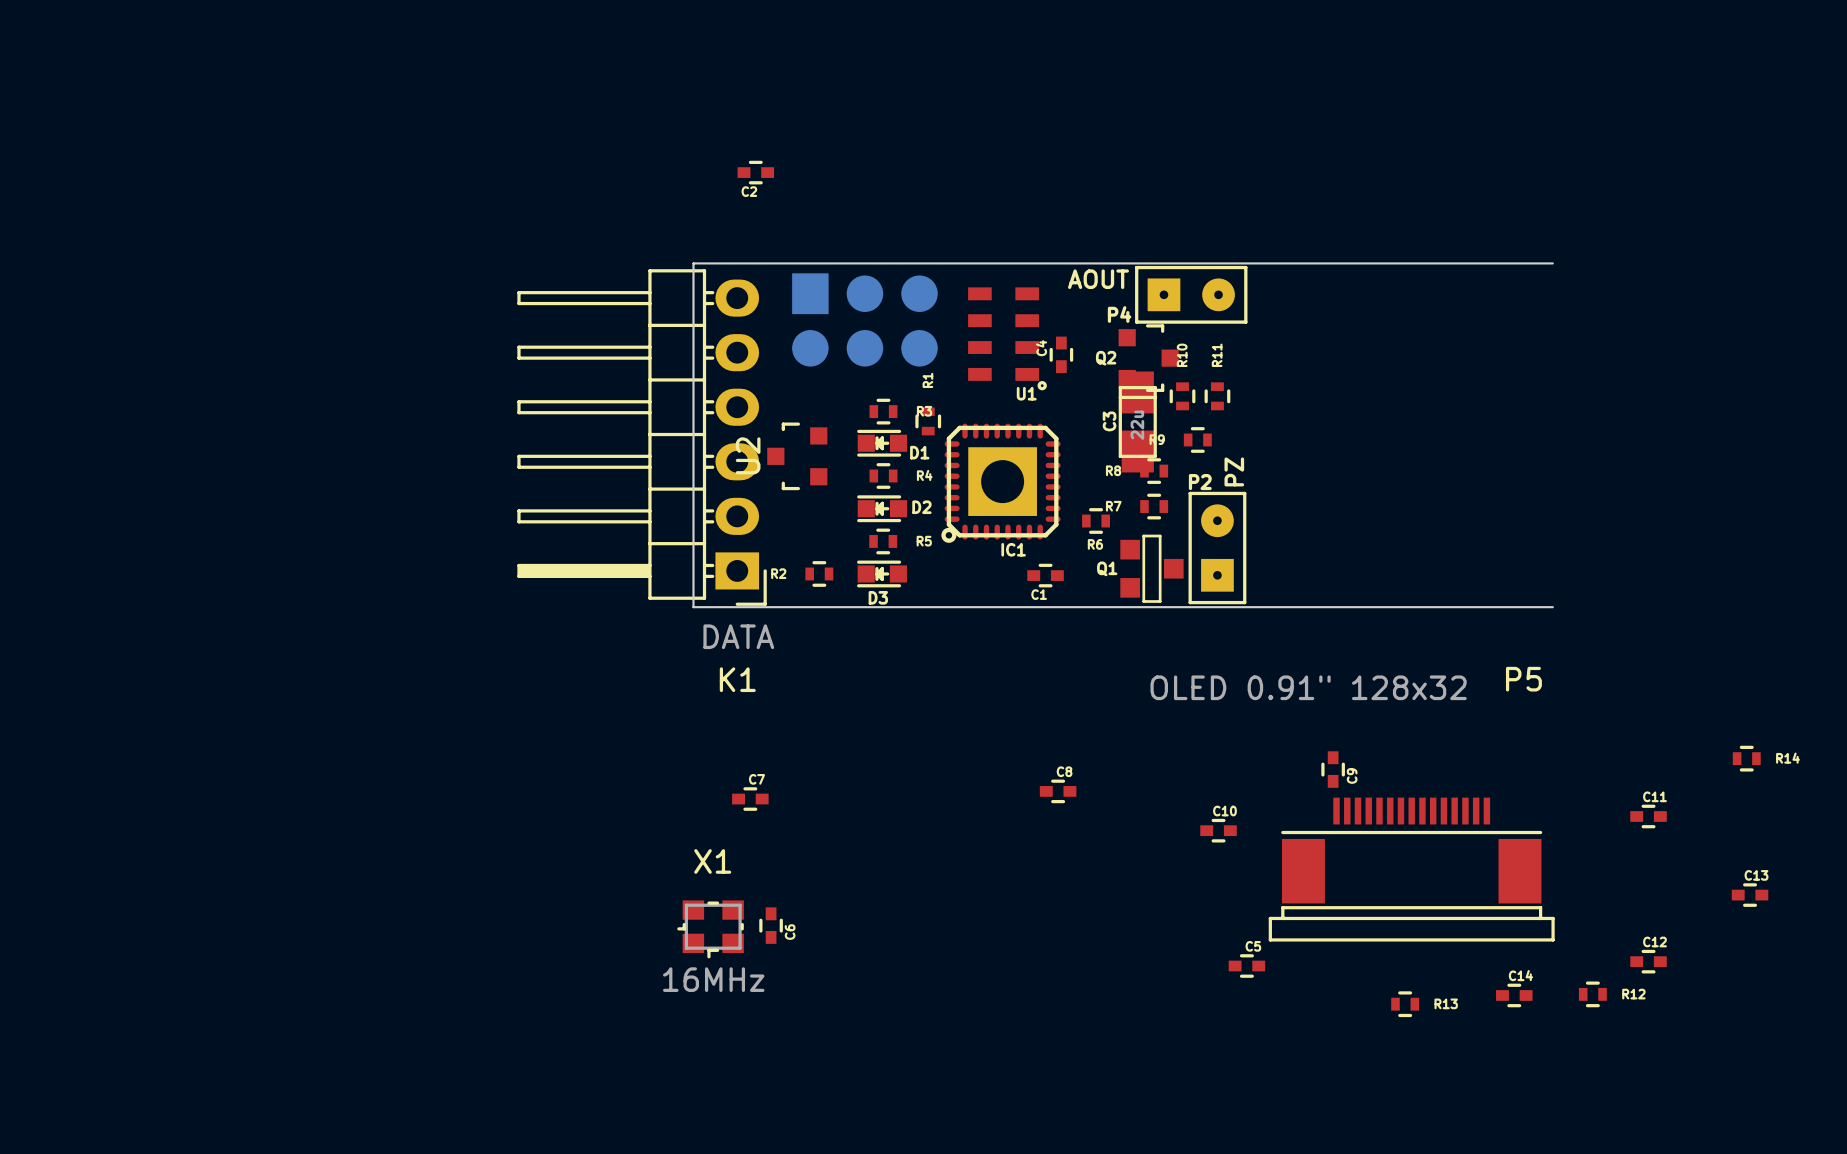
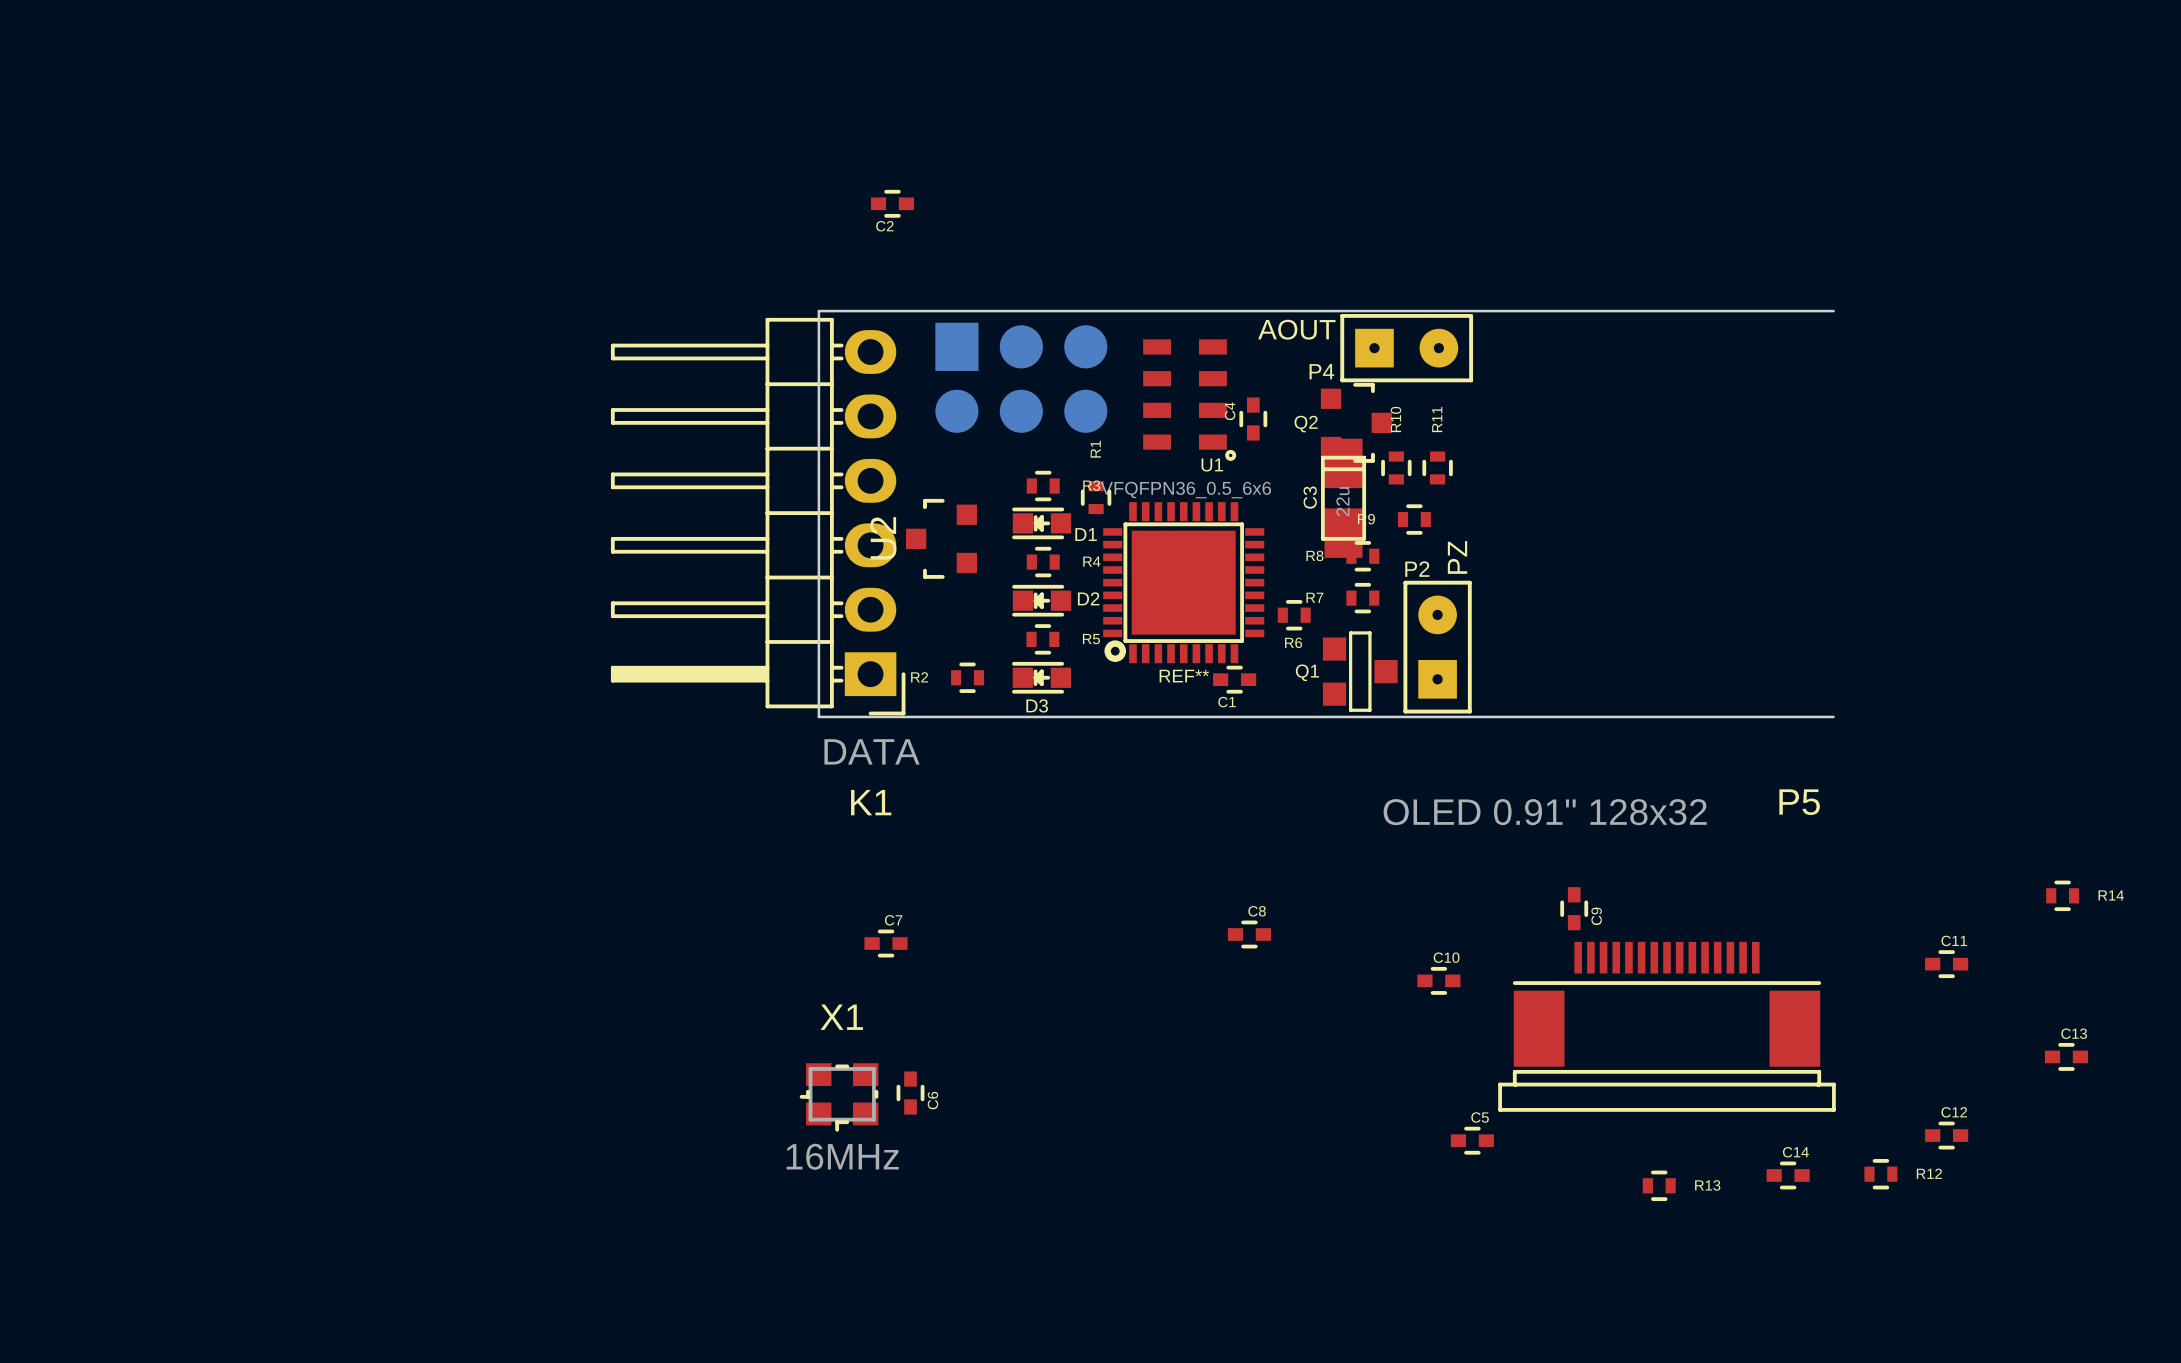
IC1: (1001, 483) -> none
REF**: none -> VFQFPN36_0.5_6x6 (1183, 582)

